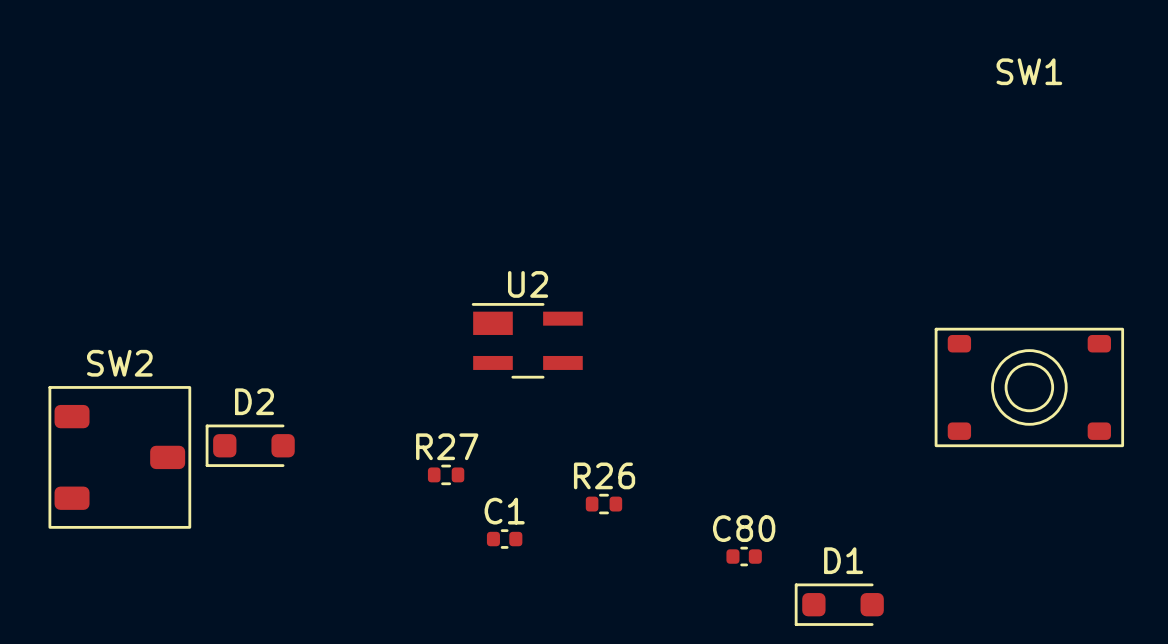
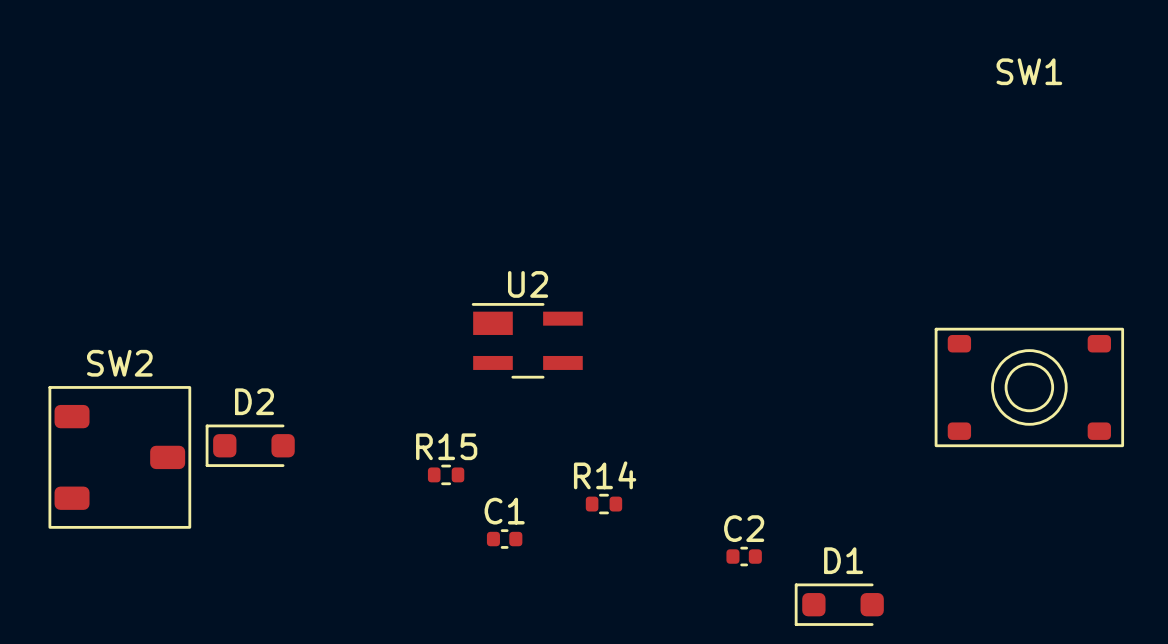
R27 name: R27 (447, 446) -> R15 (446, 446)
R26 name: R26 (604, 475) -> R14 (605, 475)
C80 name: C80 (744, 528) -> C2 (744, 528)

